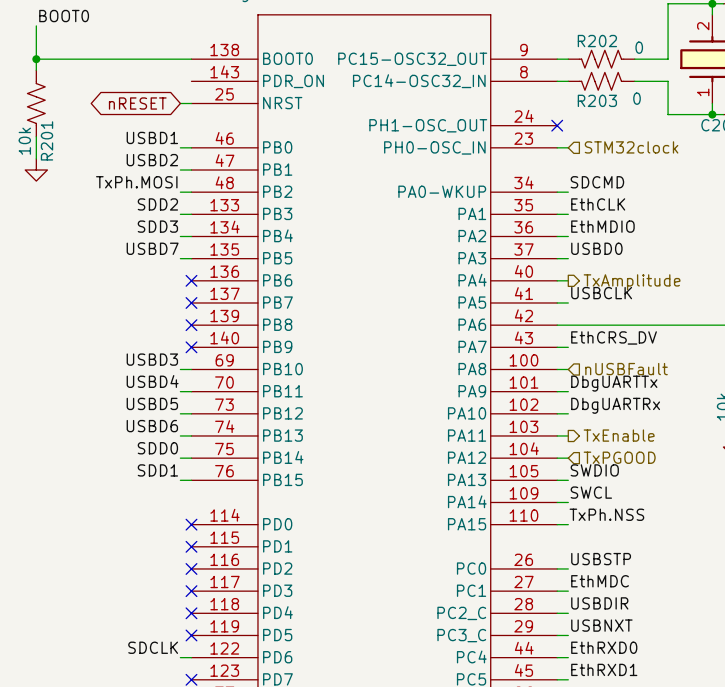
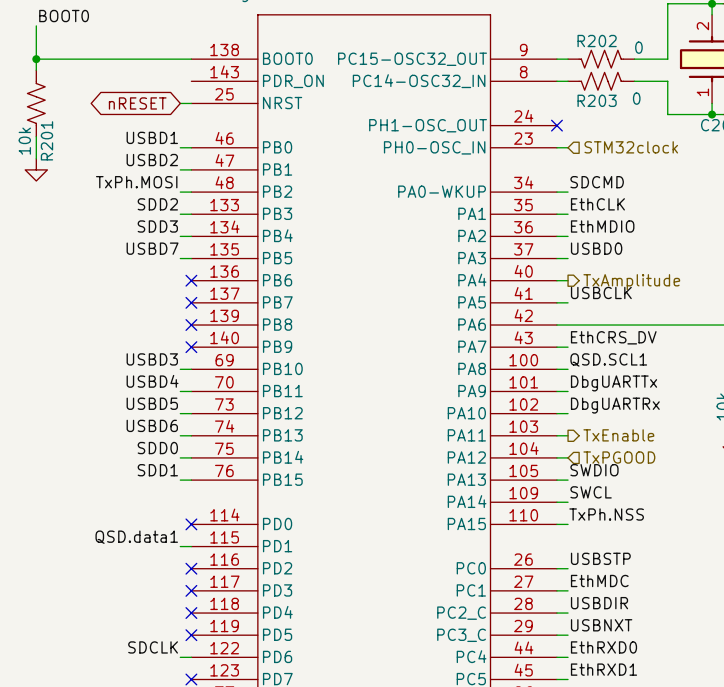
label: none -> QSD.SCL1 (608, 359)
hierarchical label: nUSBFault (626, 369) -> none
label: none -> QSD.data1 (136, 537)
wire: none -> (180, 546) (191, 546)
no-connect mark: (191, 546) -> none

